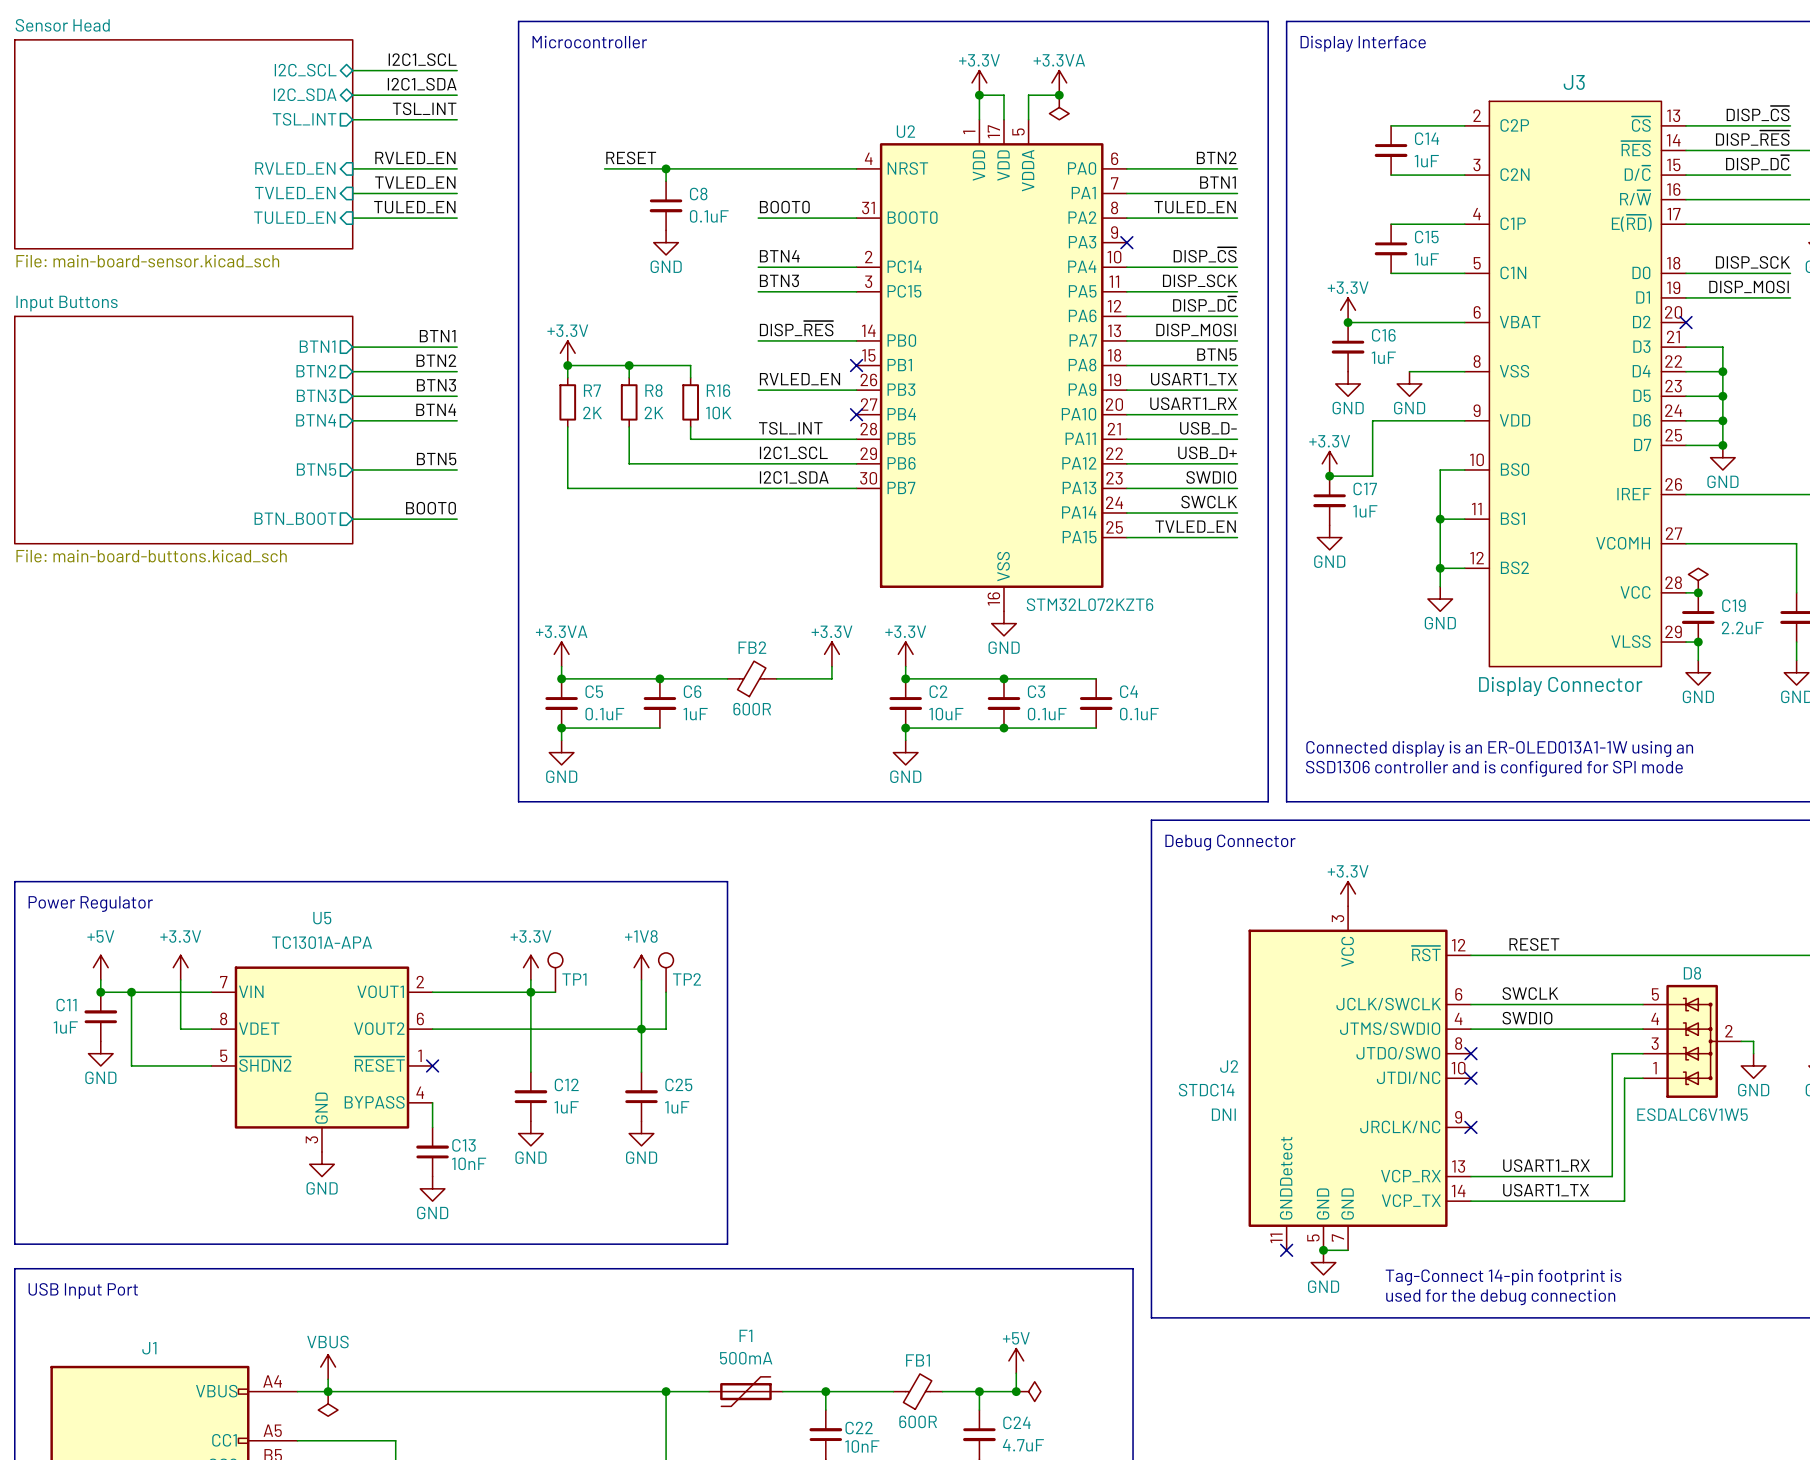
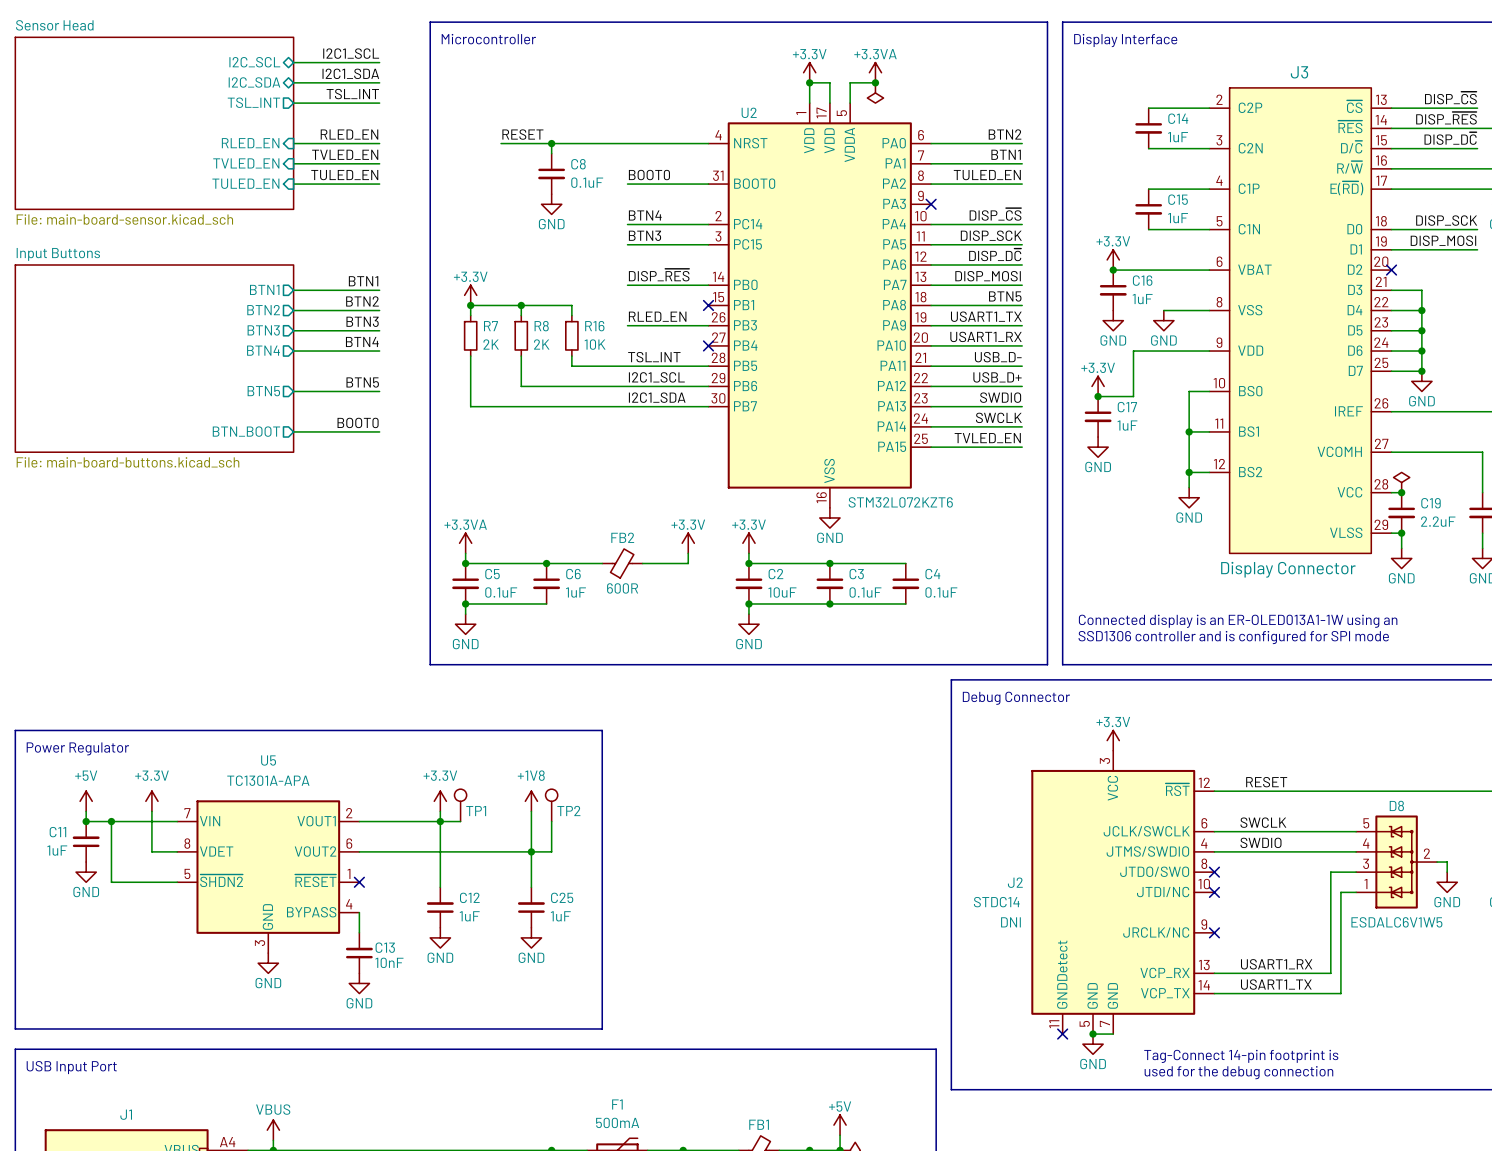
label: RVLED_EN (415, 157) -> RLED_EN (349, 134)
sheet pin: RVLED_EN (295, 168) -> RLED_EN (250, 143)
label: RVLED_EN (799, 379) -> RLED_EN (657, 316)

